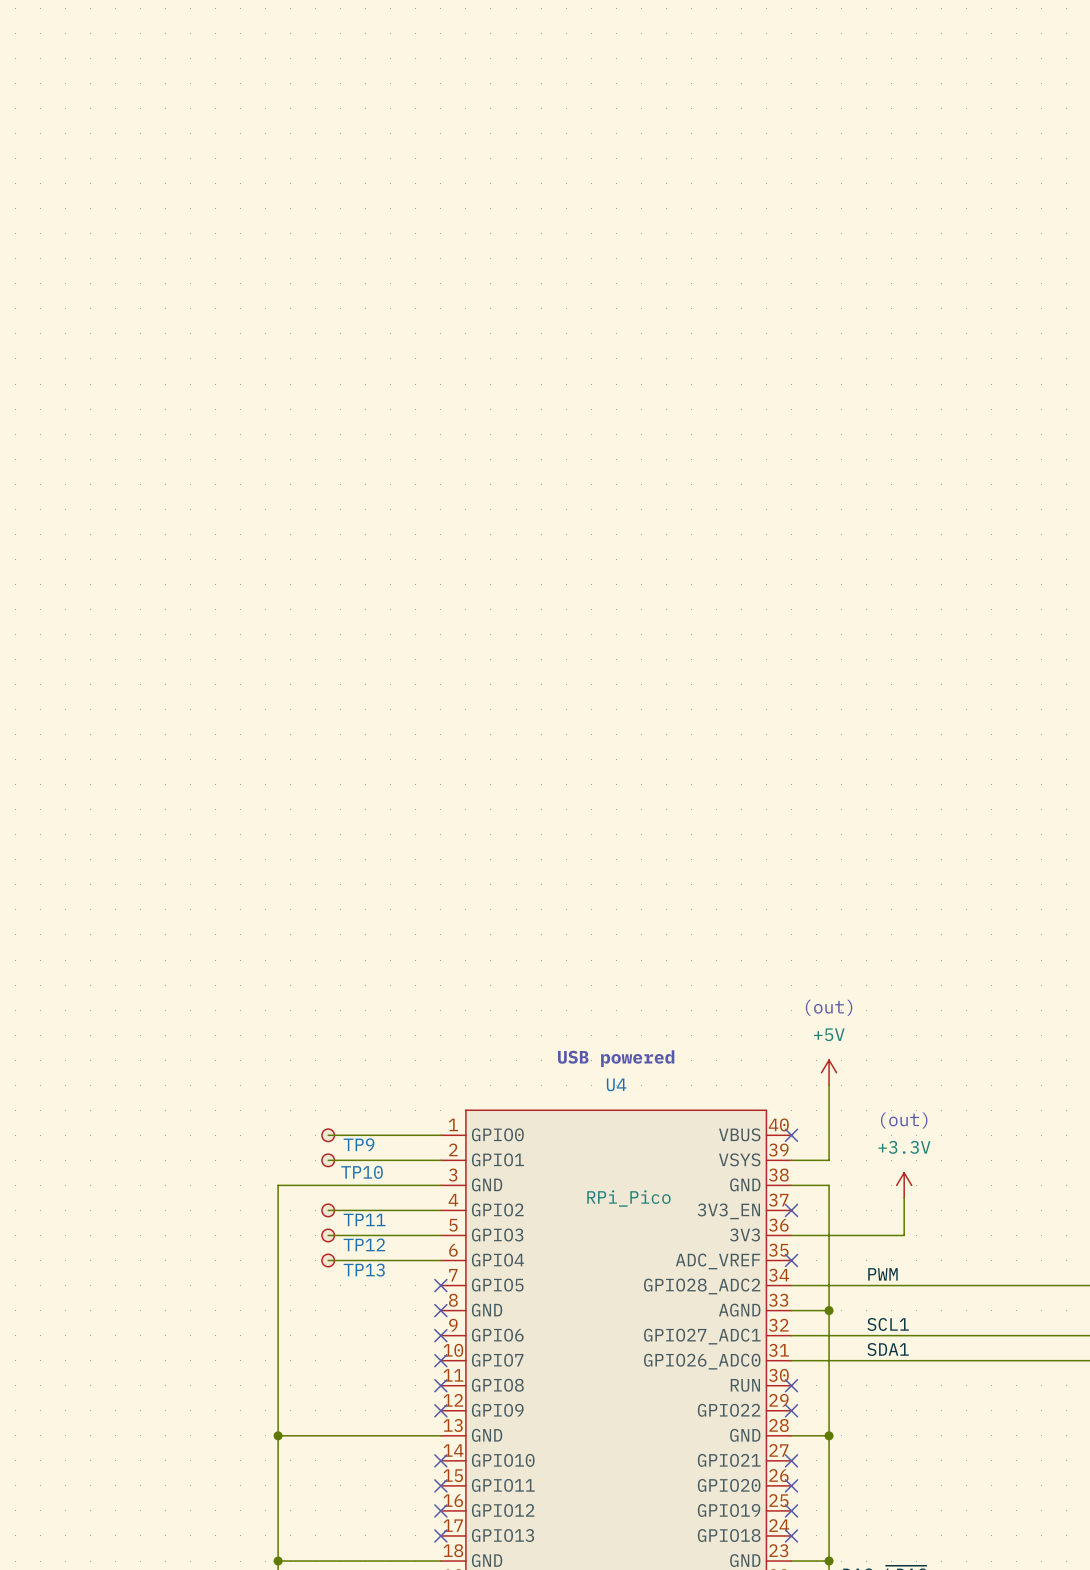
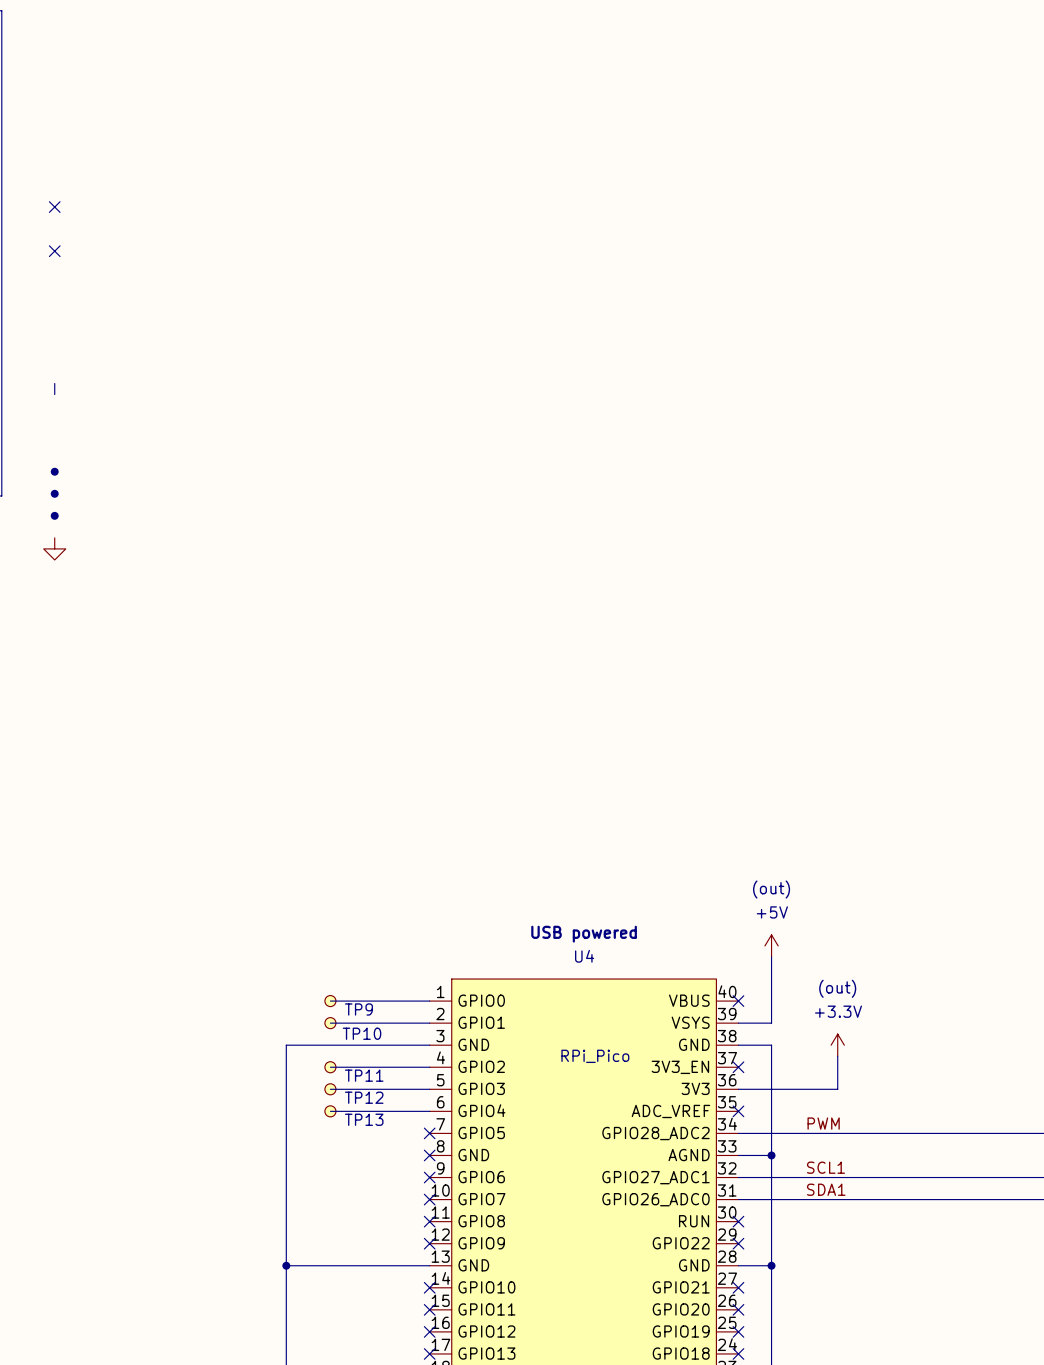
no-connect mark: none -> (54, 207)
no-connect mark: none -> (54, 251)
wire: none -> (54, 383) (54, 394)
junction: none -> (54, 471)
junction: none -> (54, 493)
junction: none -> (54, 515)
power symbol: none -> (54, 548)

